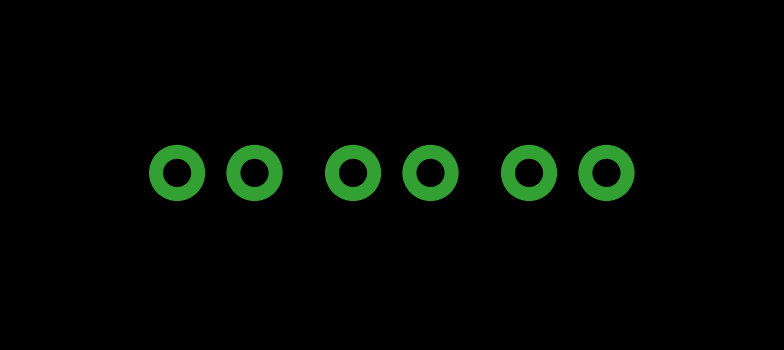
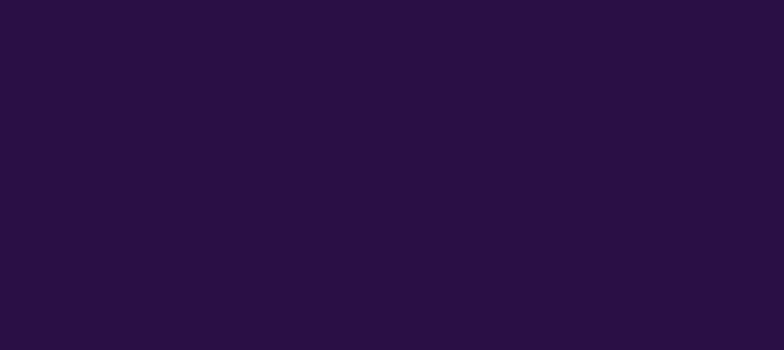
part: (215, 172) -> none
part: (391, 172) -> none
part: (567, 172) -> none

